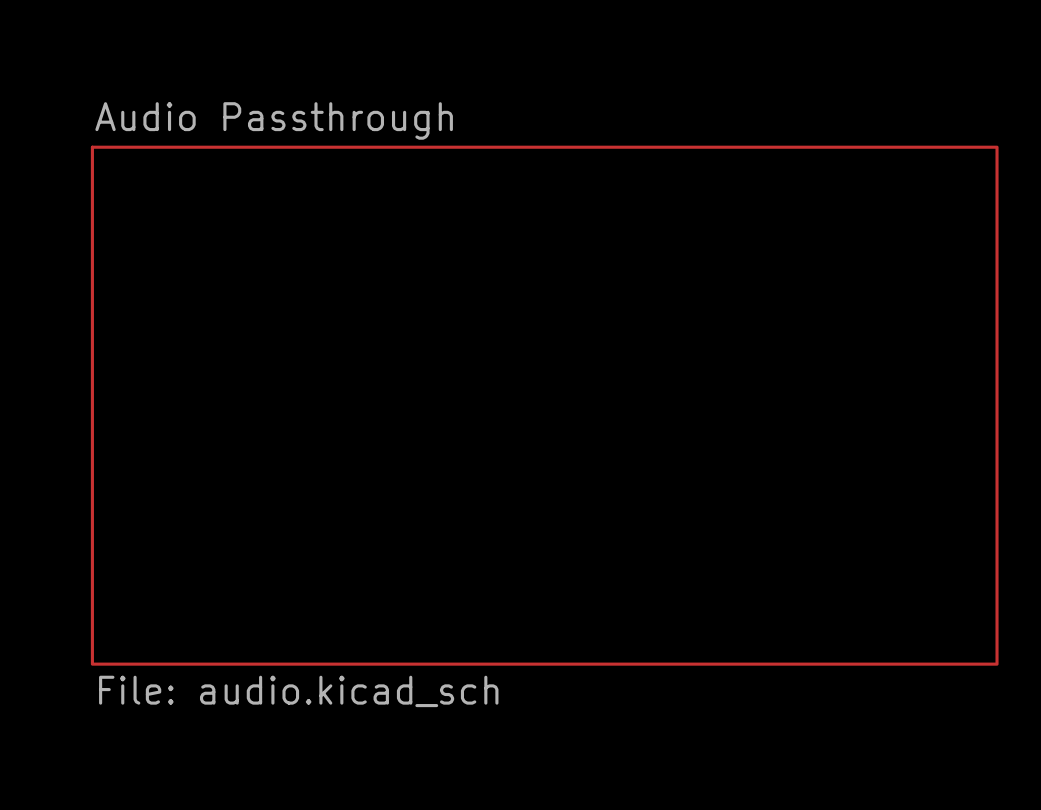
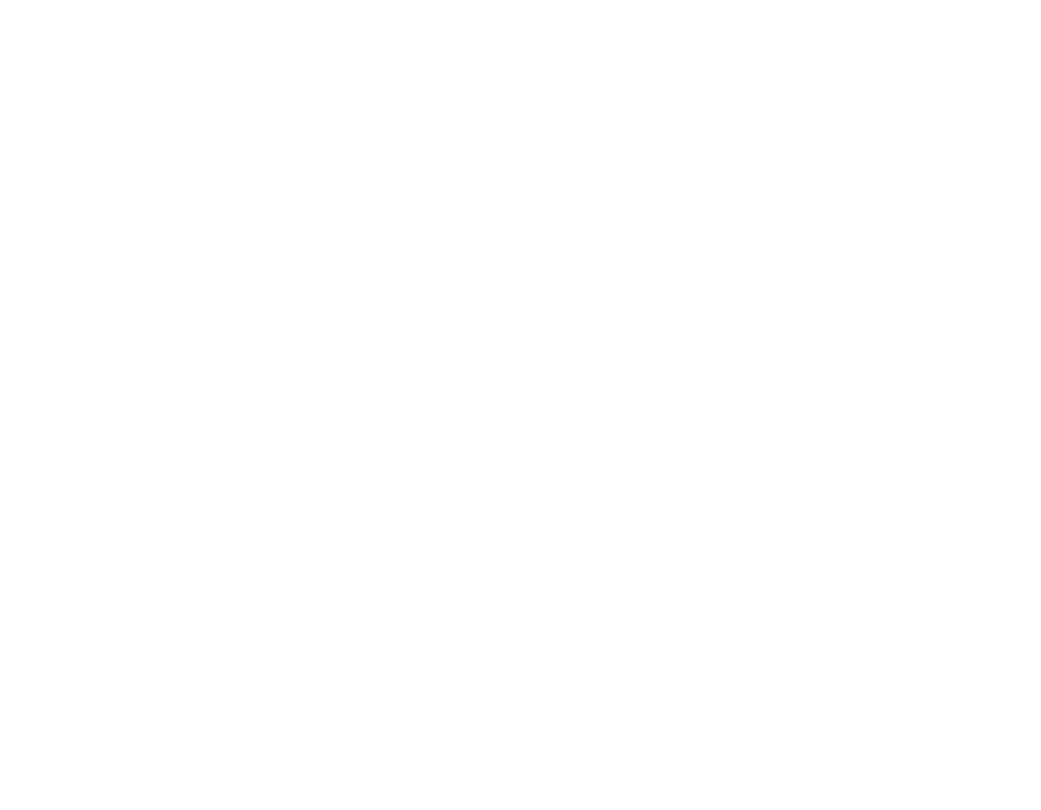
sheet Audio Passthrough: File: audio.kicad_sch (544, 405) -> none

